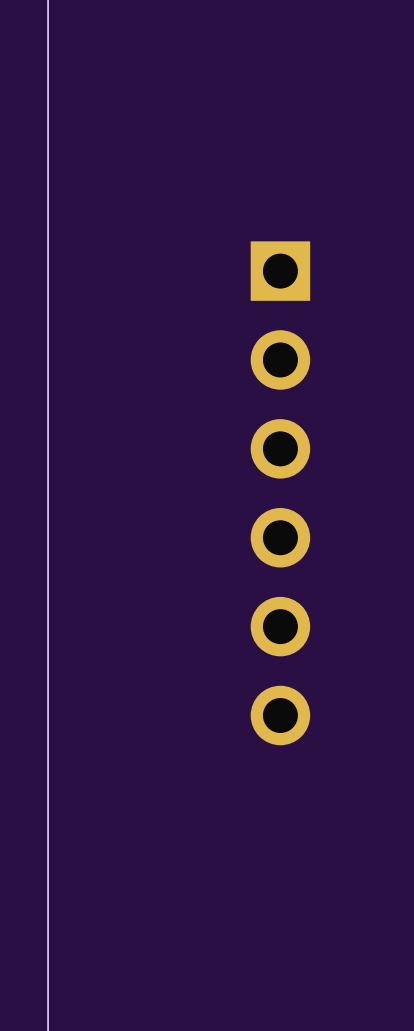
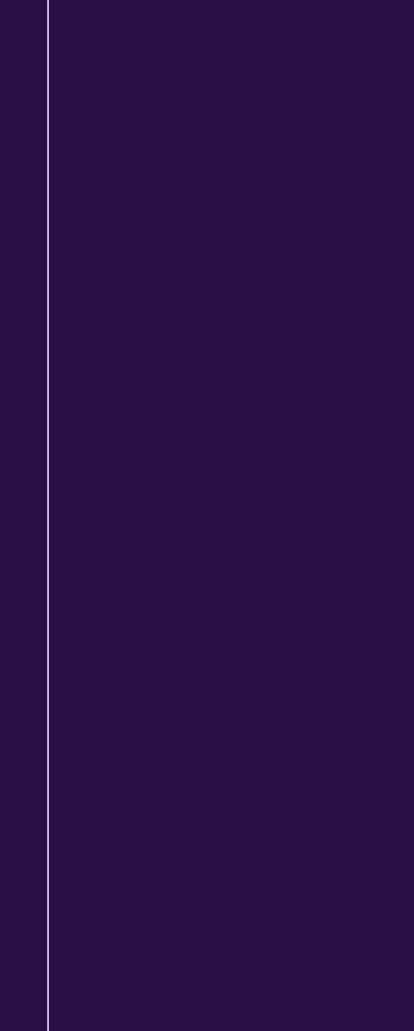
part: (280, 493) -> none

